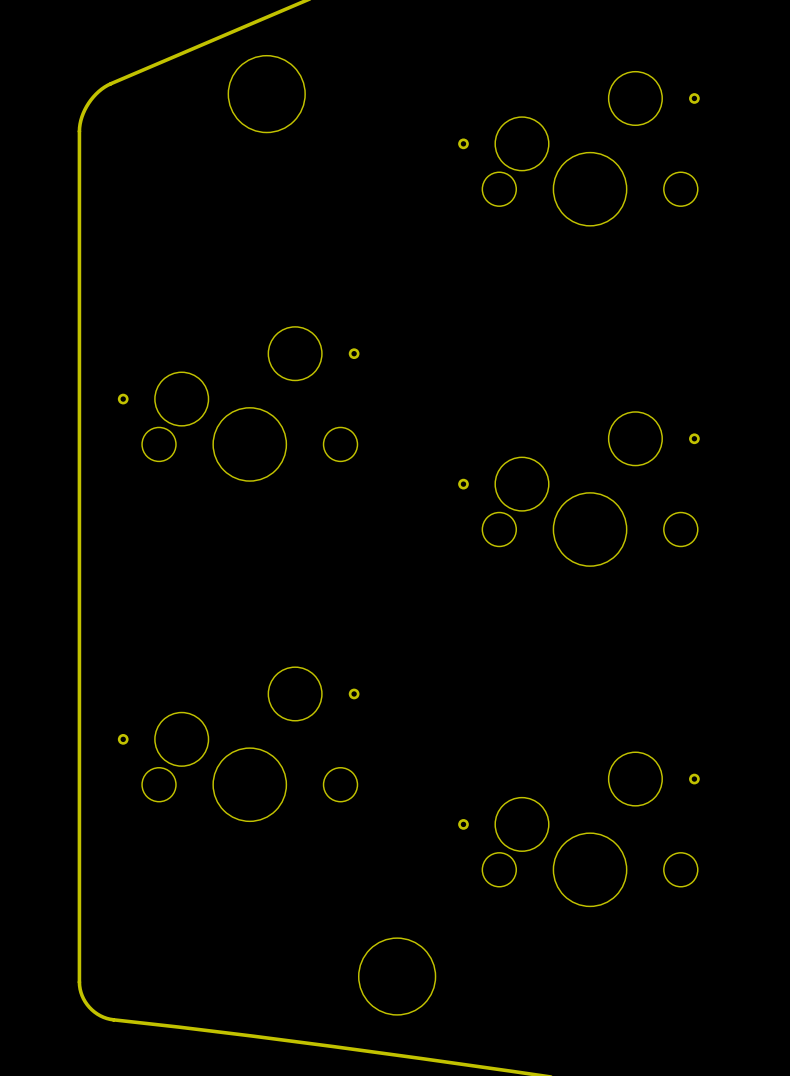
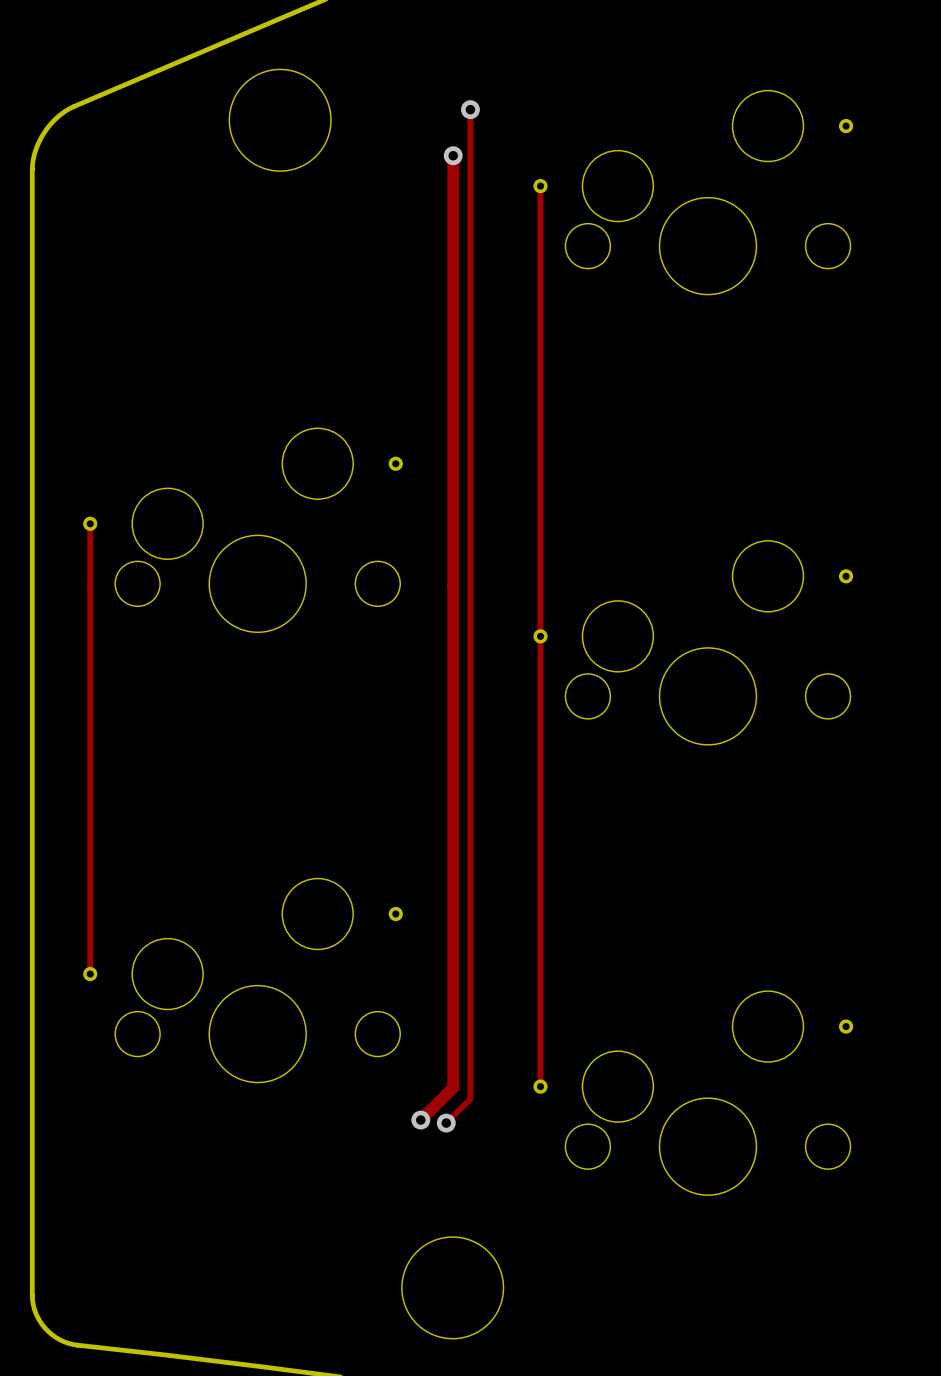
track: none -> (470, 109) (470, 1098) (446, 1123)
via: none -> (470, 109)
track: none -> (453, 155) (453, 1087) (420, 1120)
via: none -> (453, 155)
track: none -> (540, 186) (540, 1086)
track: none -> (90, 523) (90, 974)
via: none -> (420, 1120)
via: none -> (446, 1123)

